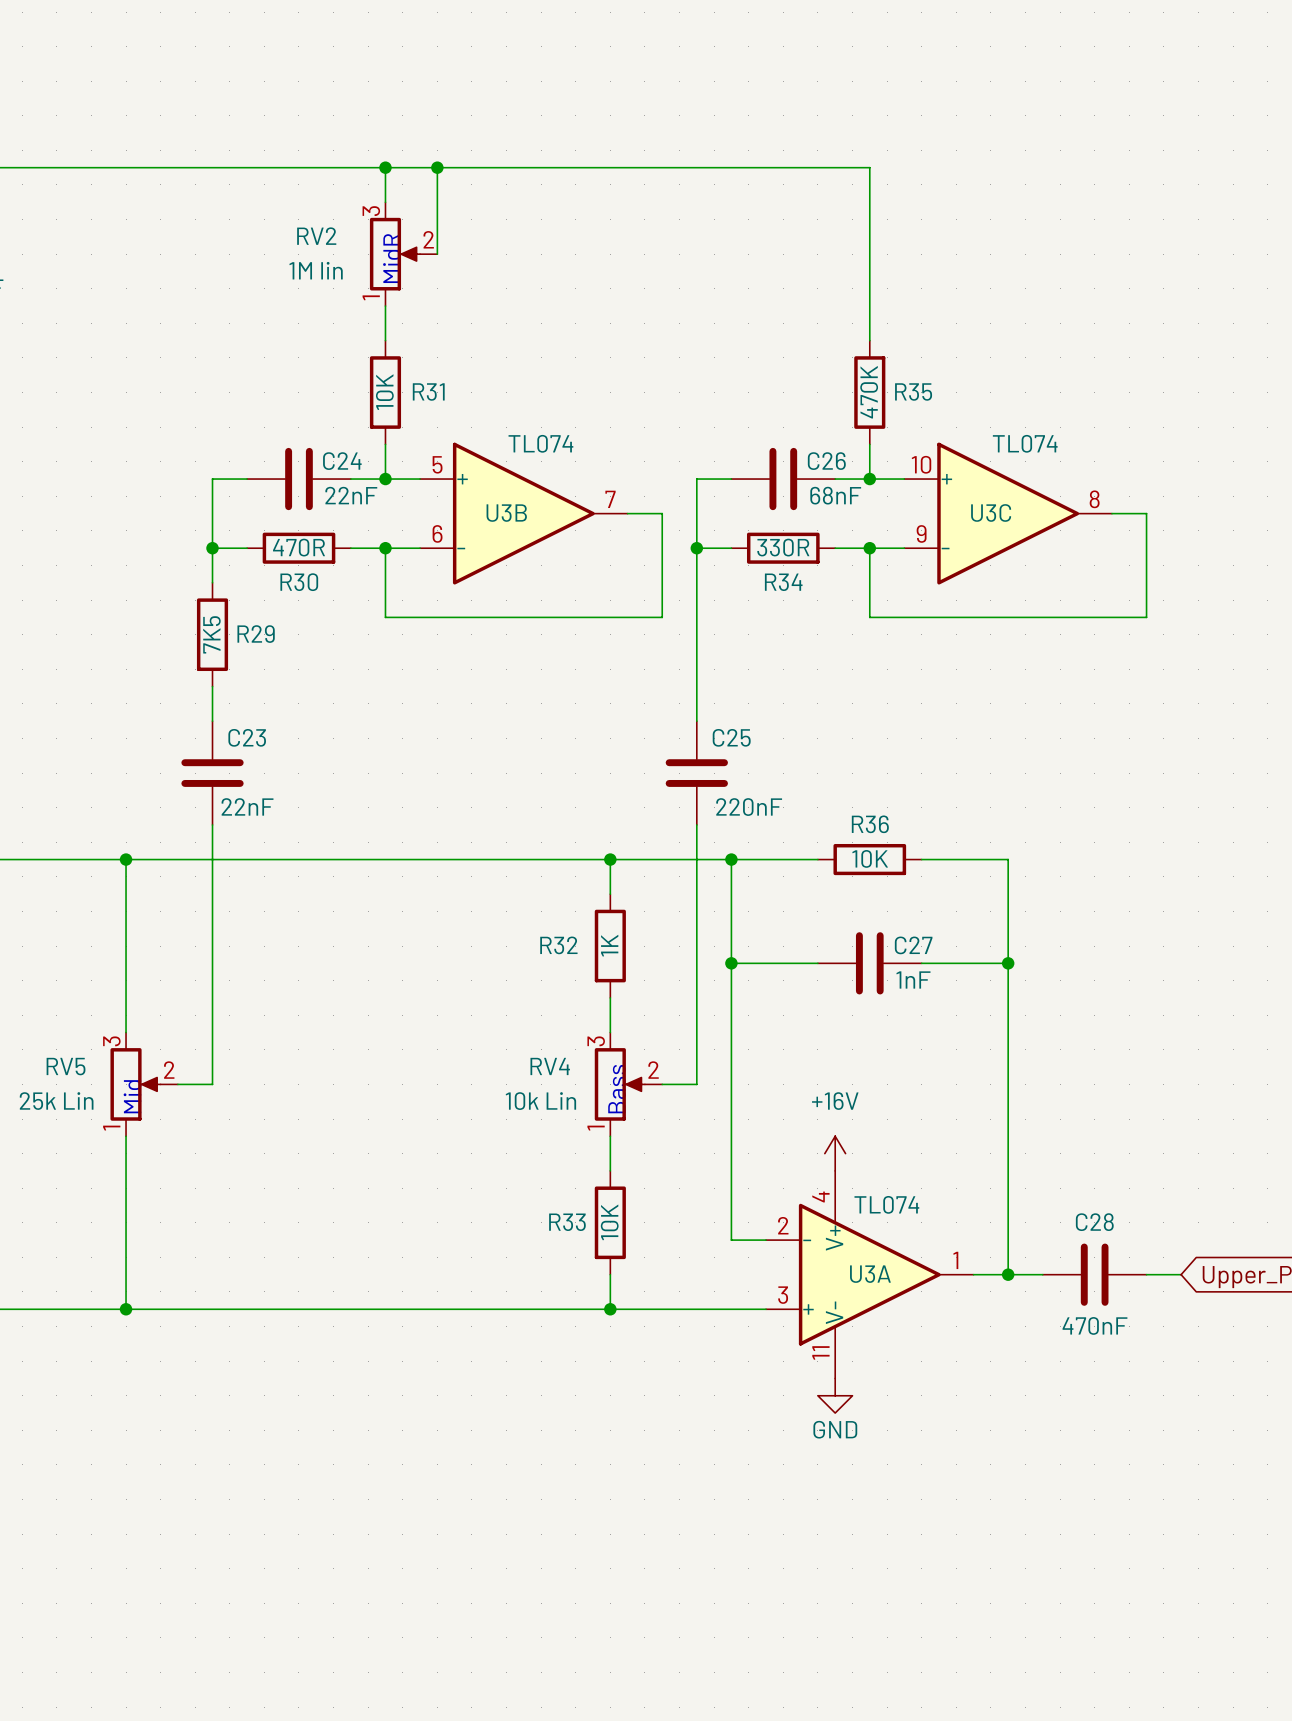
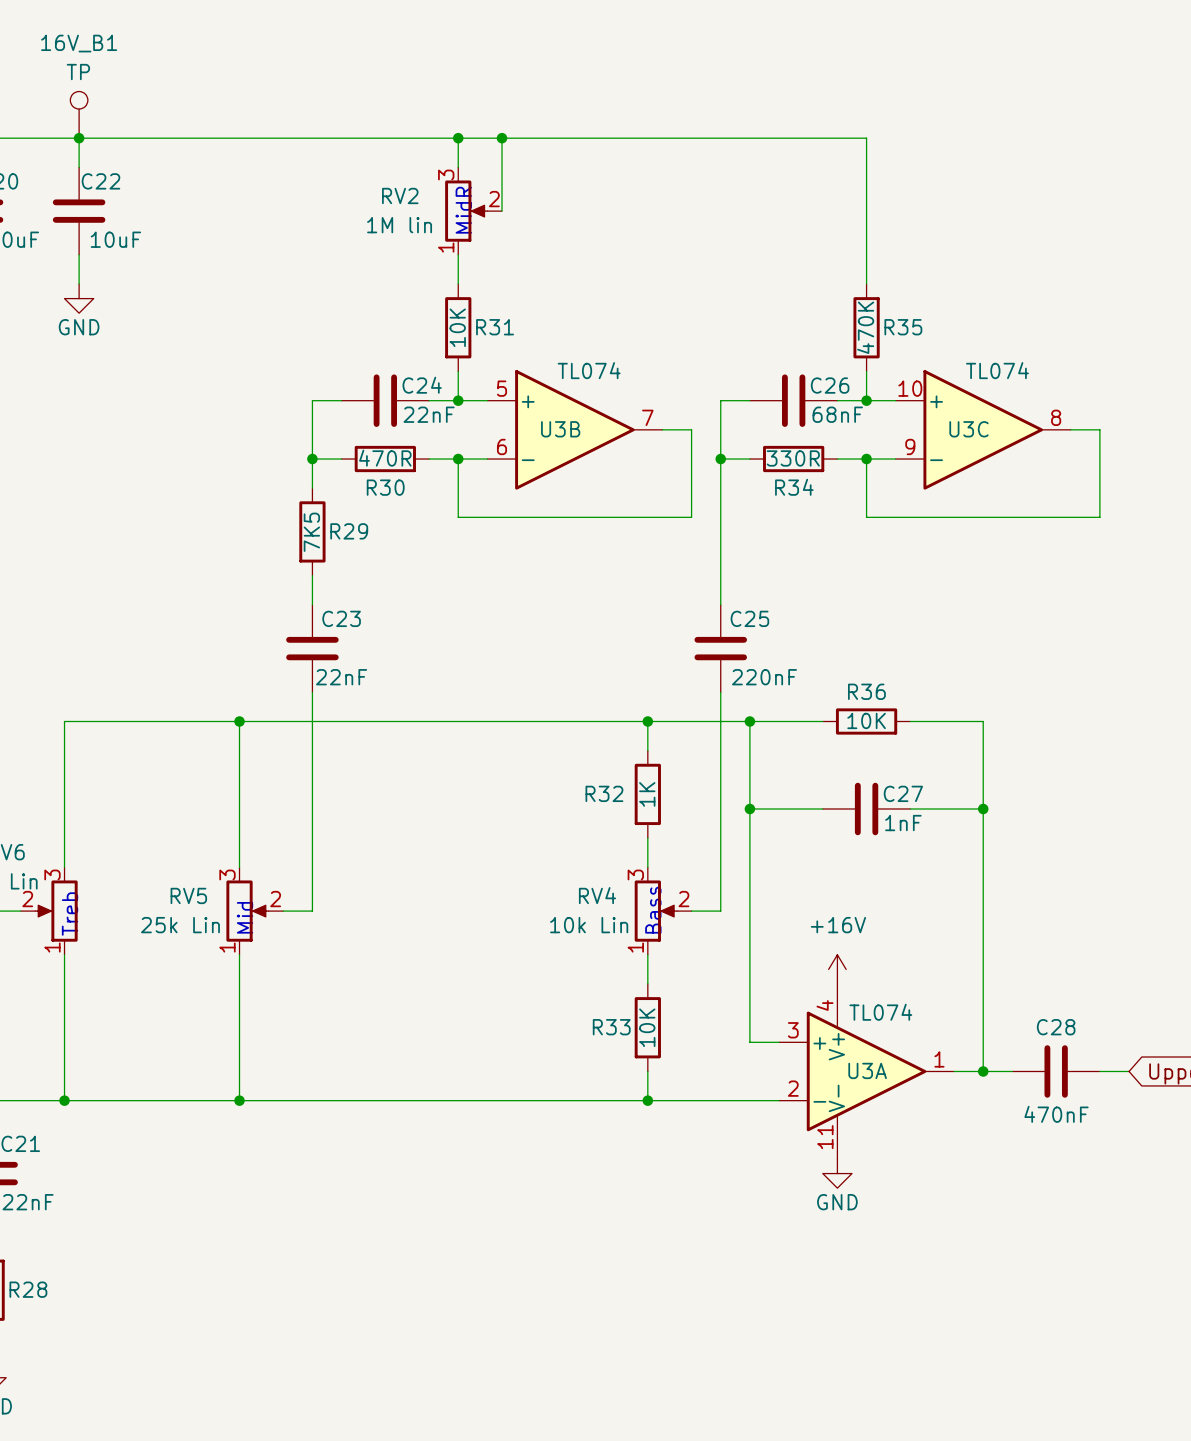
U3A flip: as is (869, 1274) -> up-down (866, 1071)

